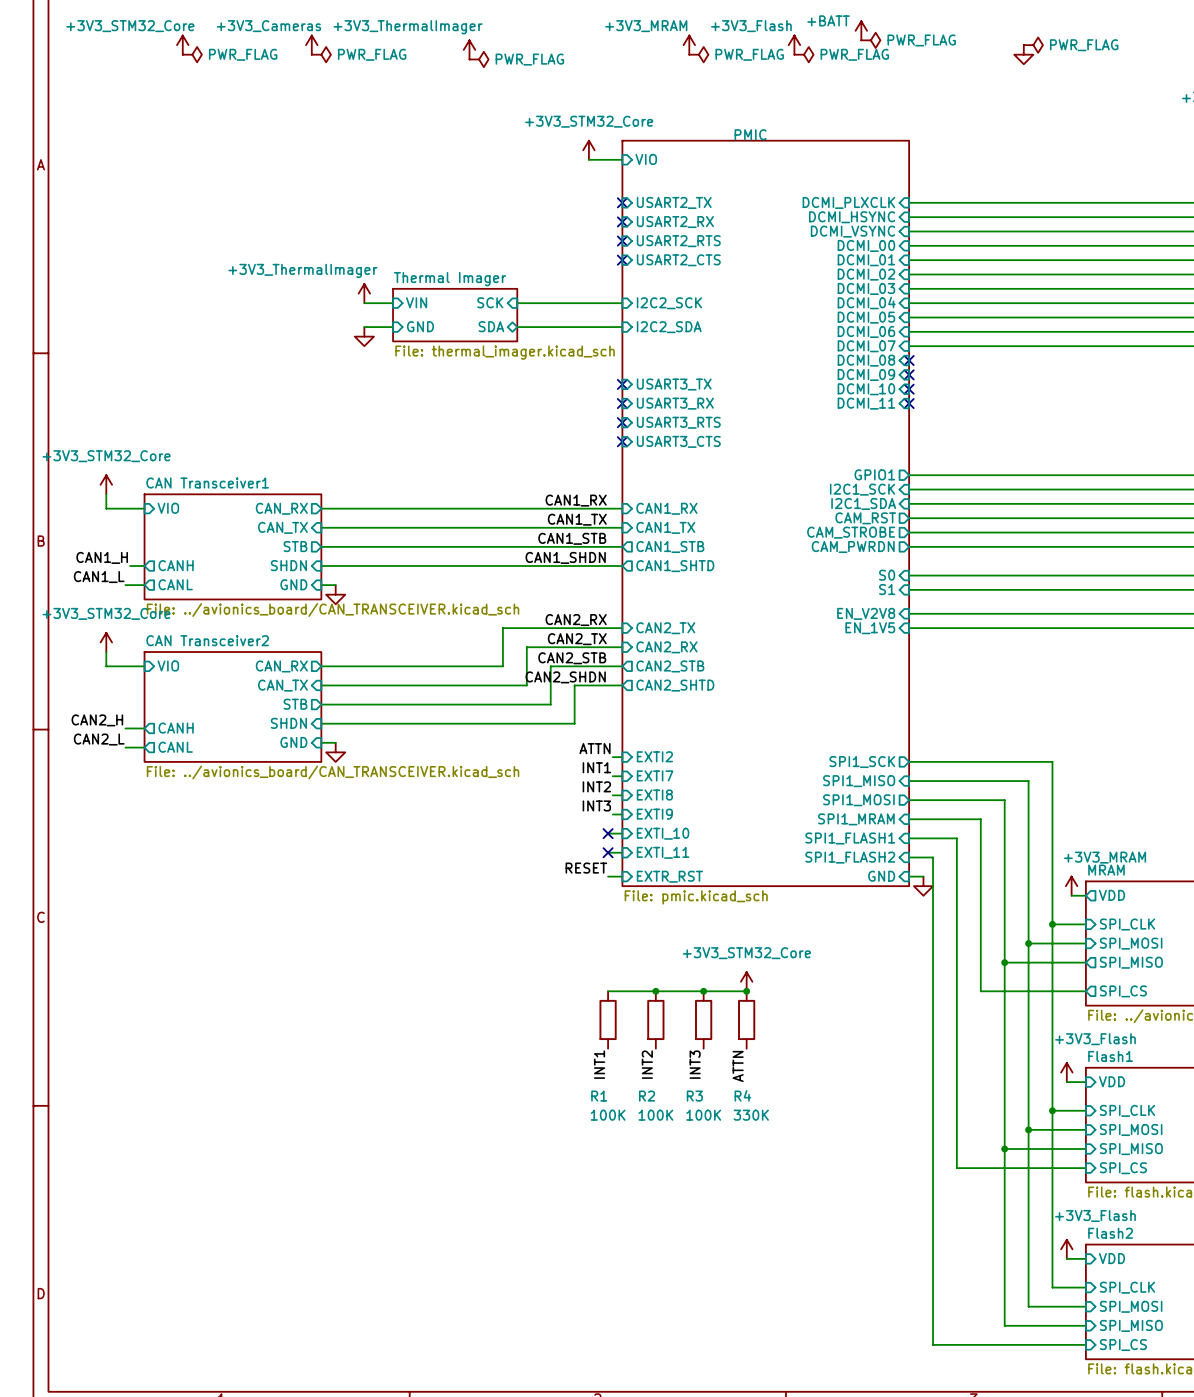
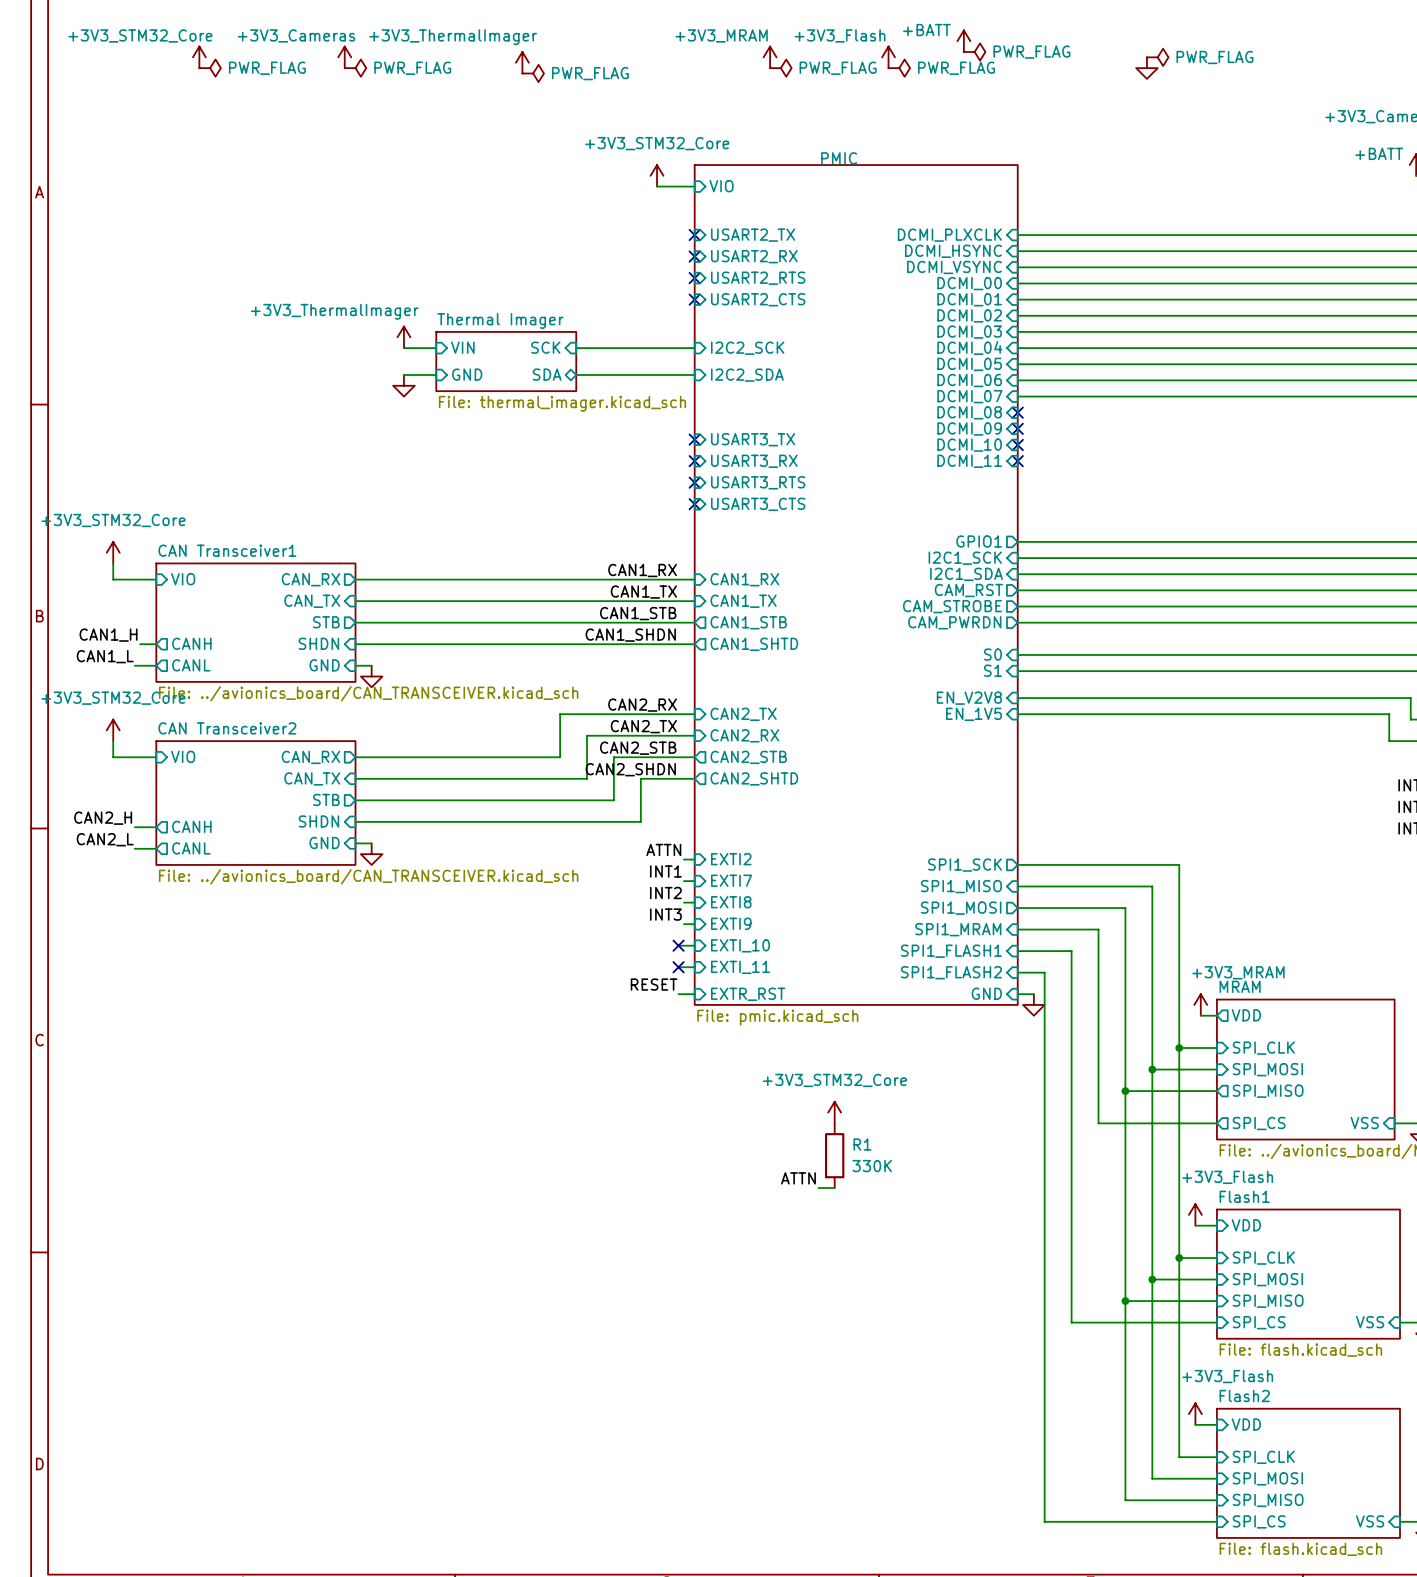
wire: (608, 991) (746, 991) -> none
junction: (655, 991) -> none
junction: (703, 991) -> none
junction: (746, 991) -> none
R1: 100K (608, 1019) -> none
R2: 100K (655, 1019) -> none
R3: 100K (703, 1019) -> none
wire: none -> (818, 1187) (834, 1187)
label: INT1 (599, 1064) -> none
label: INT2 (647, 1064) -> none
label: INT3 (695, 1064) -> none
label rotation: 0° (738, 1066) -> 90° clockwise (798, 1178)
R4 name: R4 (742, 1095) -> R1 (862, 1144)
R4 value position: 330K (751, 1115) -> 330K (872, 1166)

